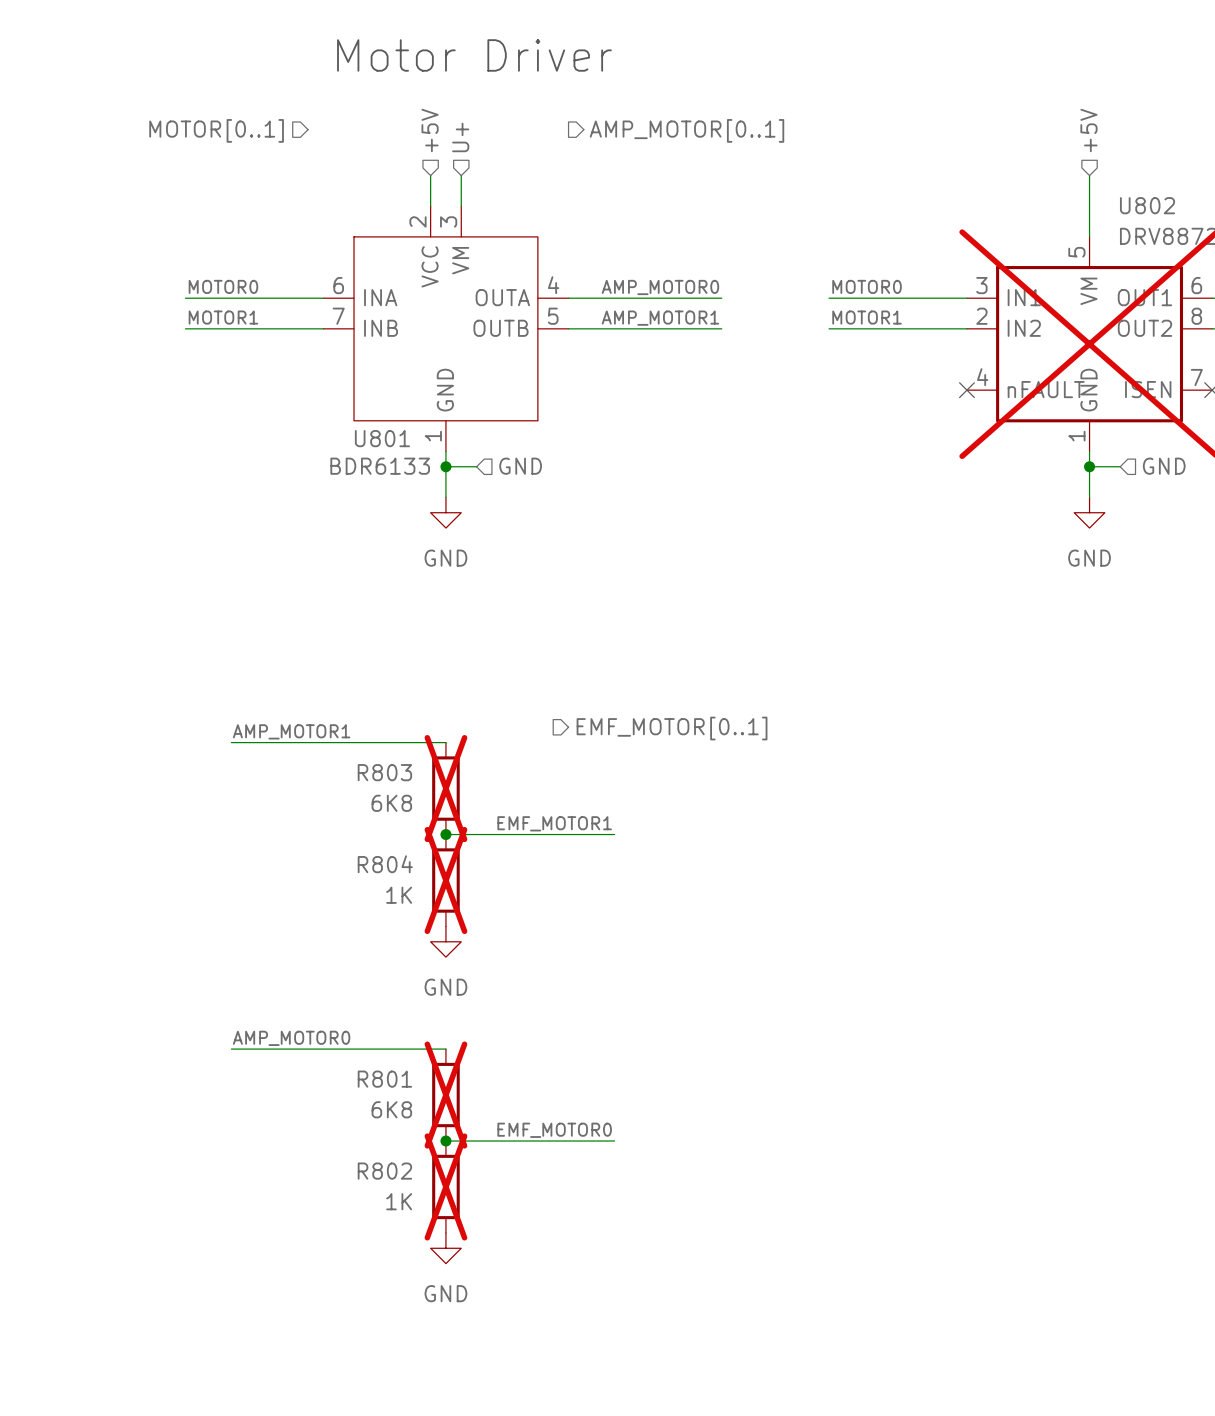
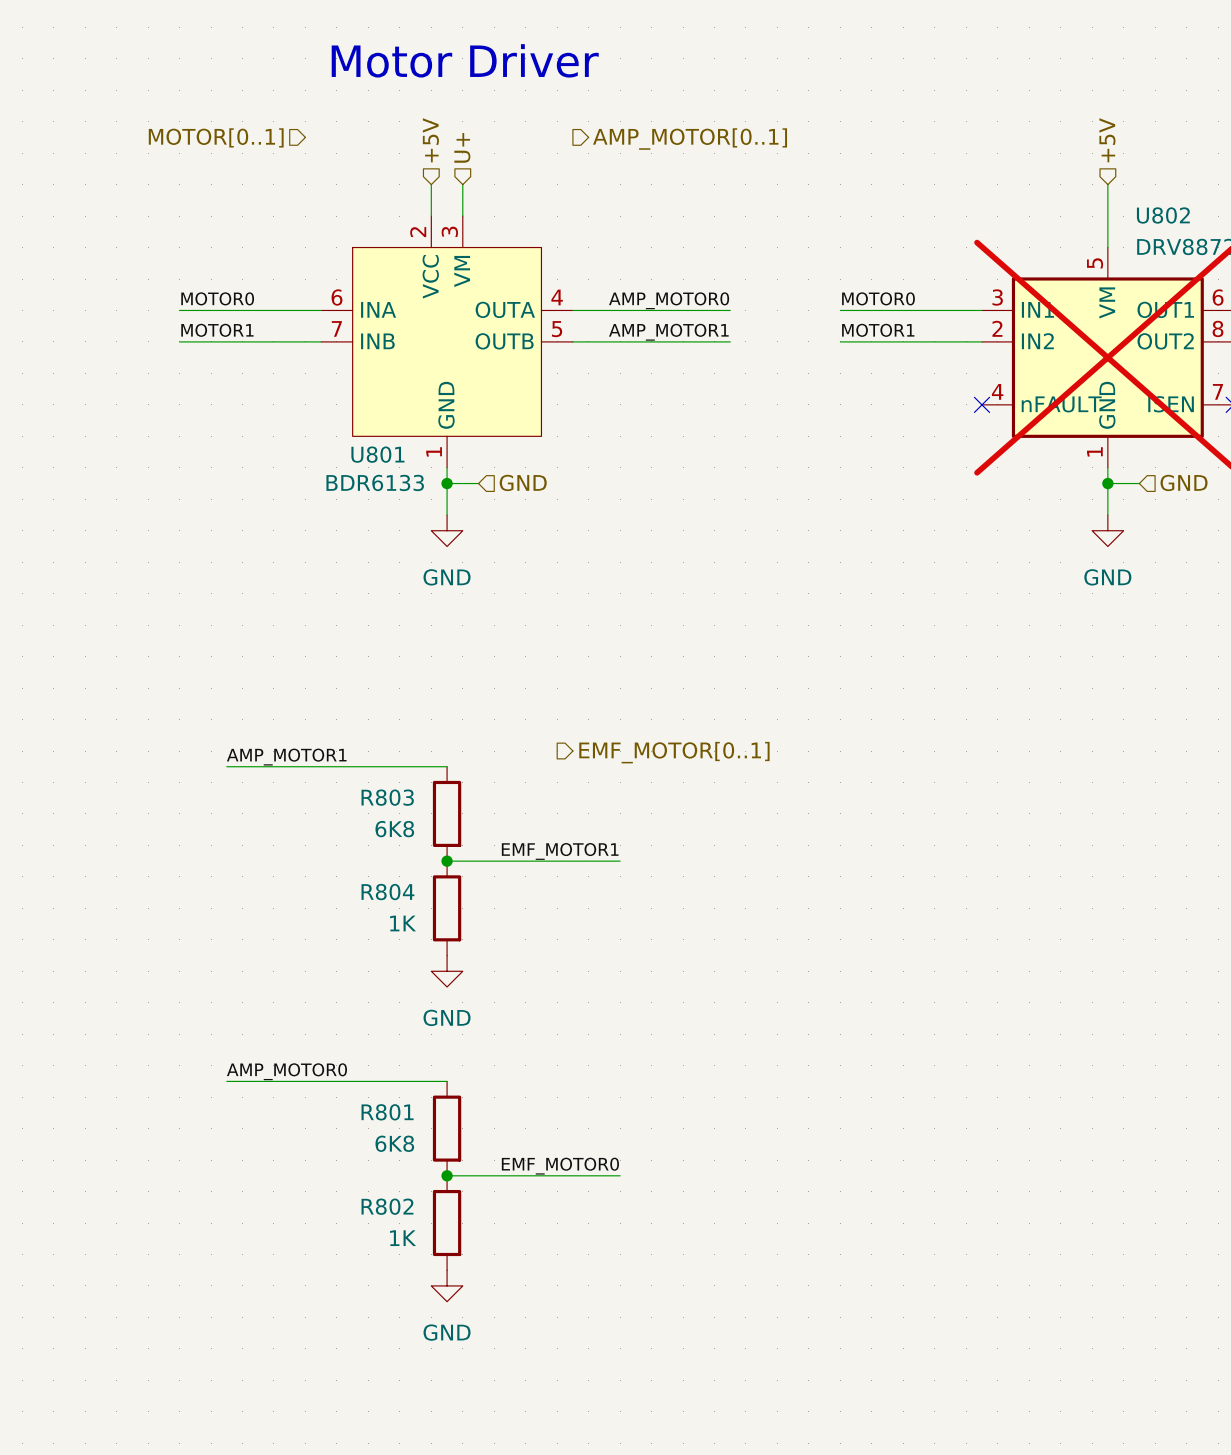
R803 do-not-place cross: (445, 788) -> none
R804 do-not-place cross: (445, 880) -> none
R801 do-not-place cross: (445, 1095) -> none
R802 do-not-place cross: (445, 1186) -> none

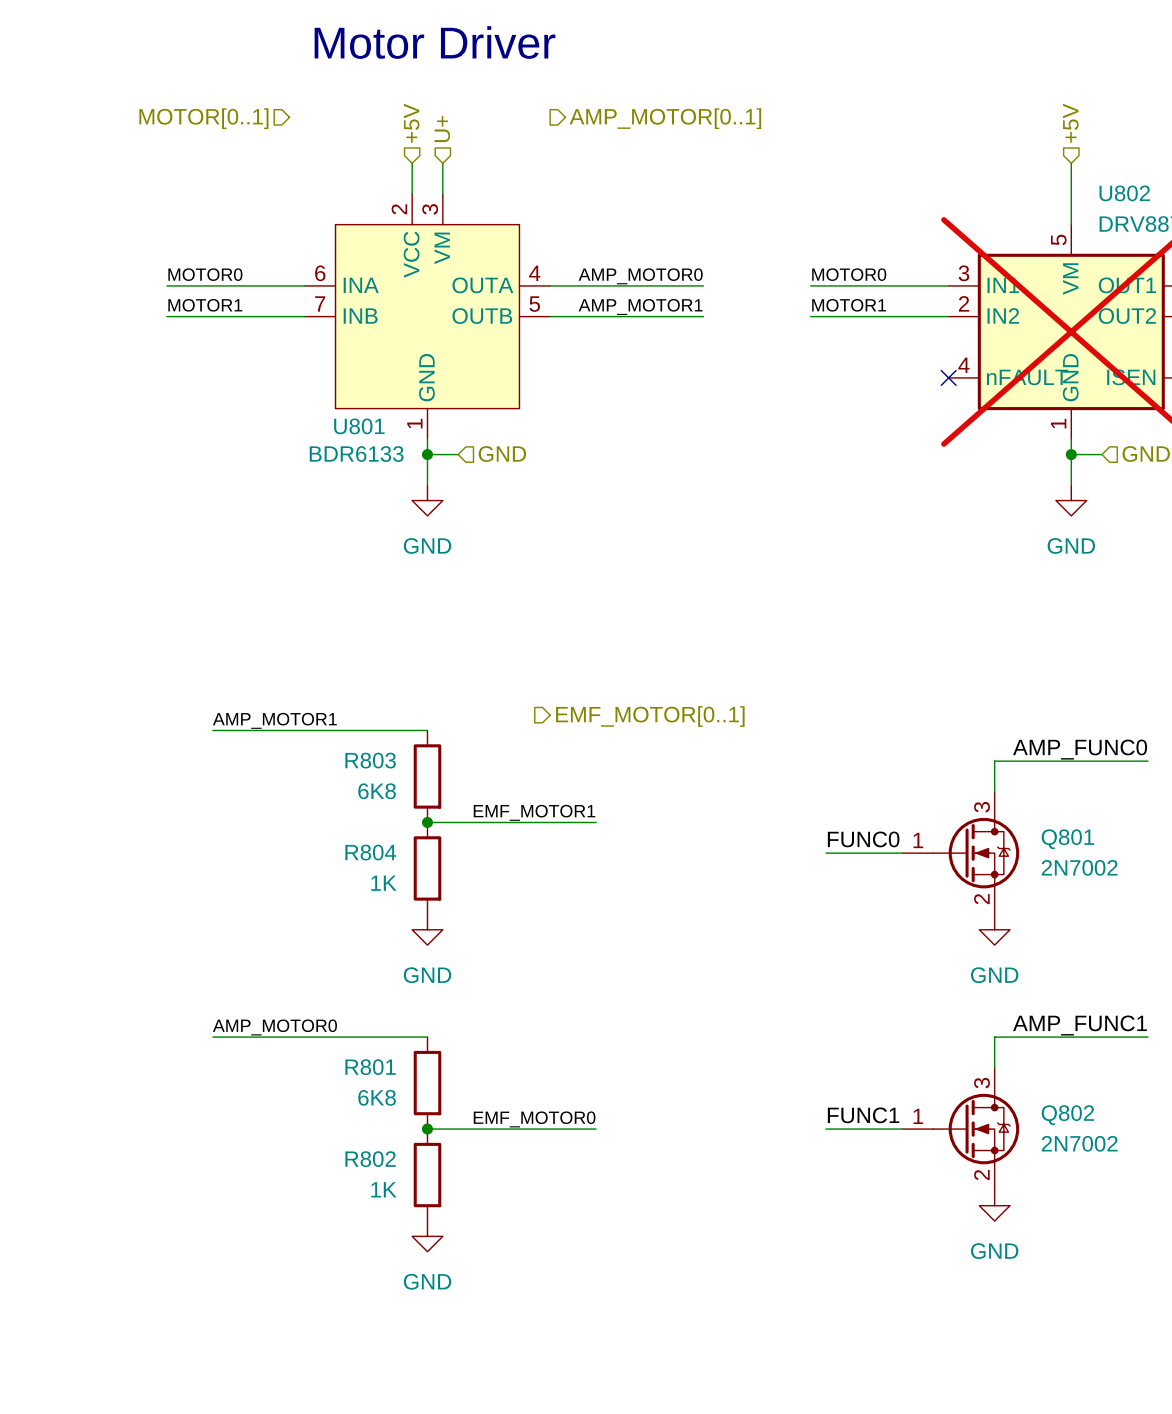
label: none -> AMP_FUNC0 (1080, 749)
wire: none -> (1147, 761) (994, 761) (994, 791)
label: none -> FUNC0 (863, 839)
wire: none -> (826, 853) (902, 853)
Q801: none -> 2N7002 (960, 853)
power symbol: none -> GND (994, 929)
label: none -> AMP_FUNC1 (1079, 1025)
wire: none -> (1147, 1037) (994, 1037) (994, 1067)
label: none -> FUNC1 (863, 1115)
wire: none -> (826, 1129) (902, 1129)
Q802: none -> 2N7002 (960, 1129)
power symbol: none -> GND (994, 1205)

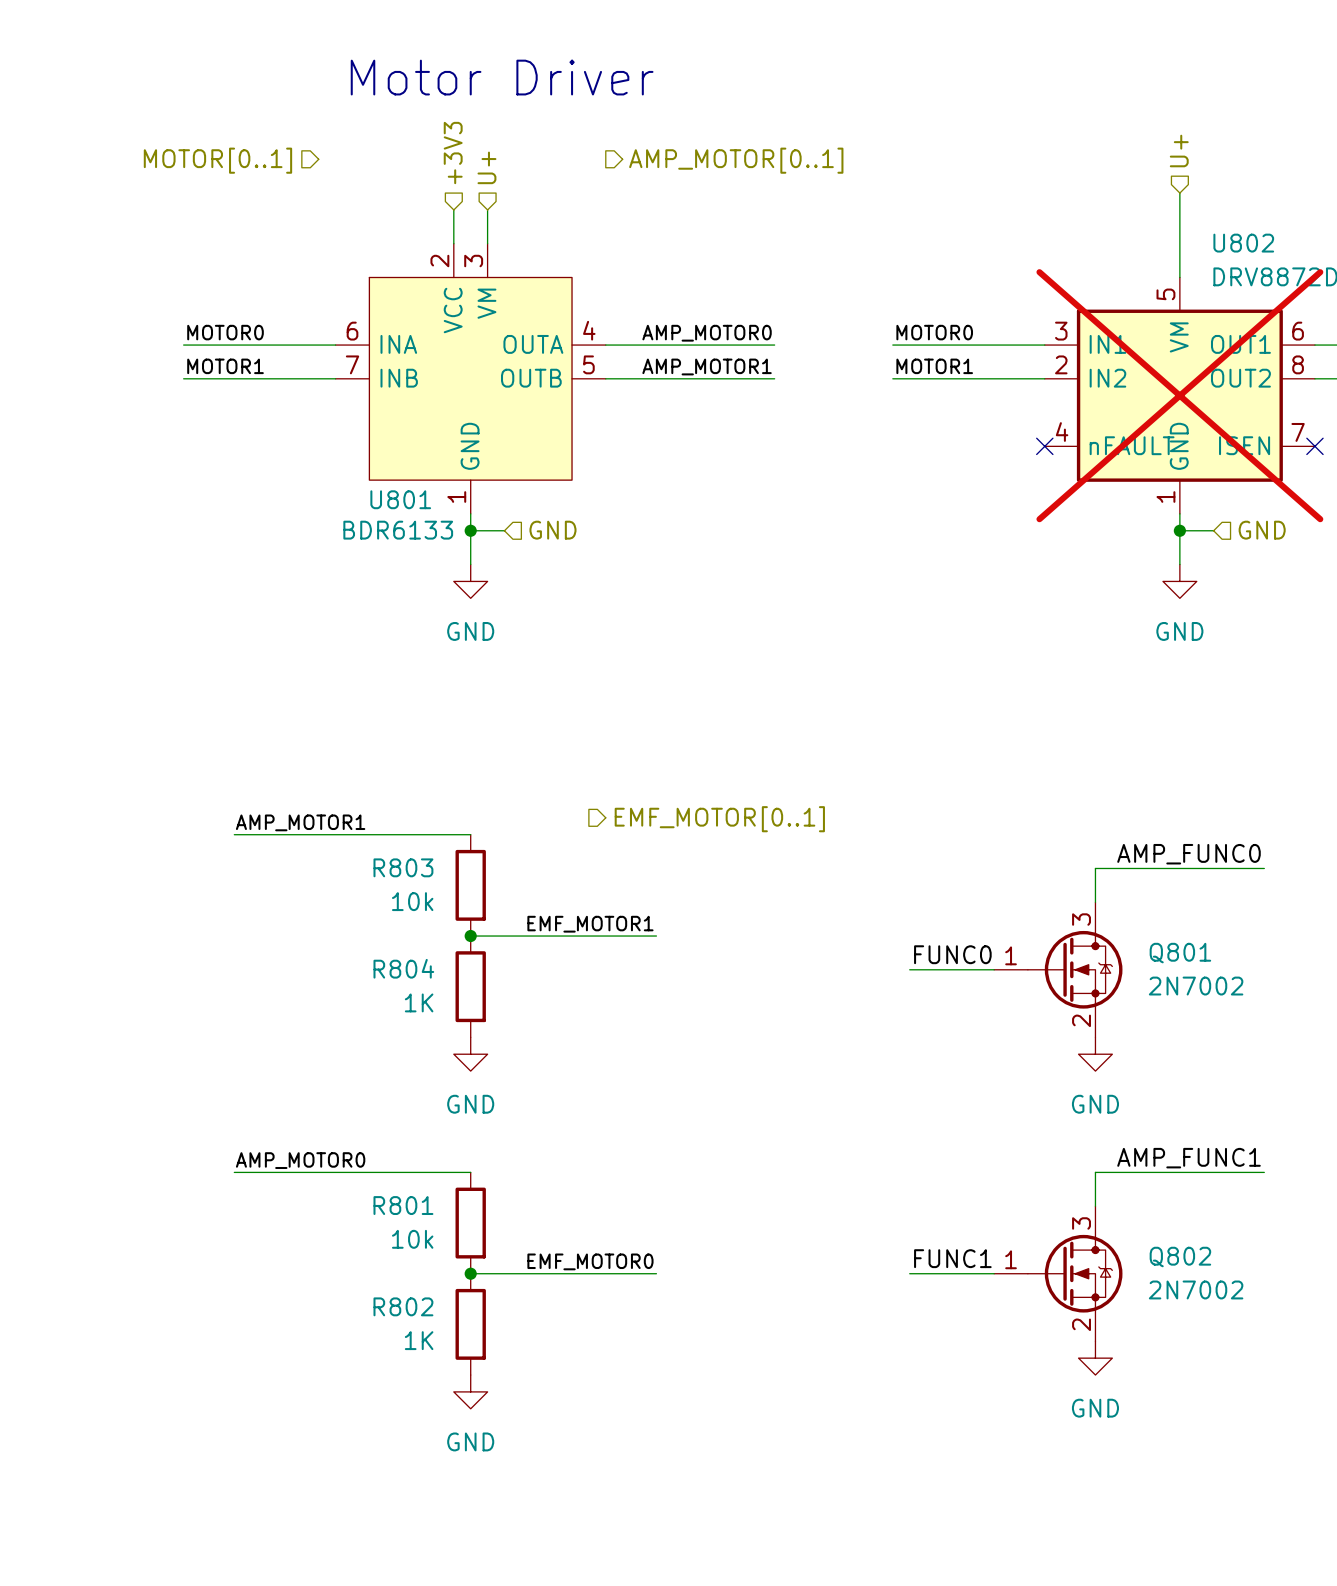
hierarchical label: none -> U+ (1179, 151)
hierarchical label: +5V (411, 123) -> +3V3 (453, 153)
hierarchical label: +5V (1070, 123) -> none
wire: none -> (1179, 193) (1179, 209)
R803 value: 6K8 (377, 791) -> 10k (412, 901)
R801 value: 6K8 (377, 1097) -> 10k (412, 1239)

